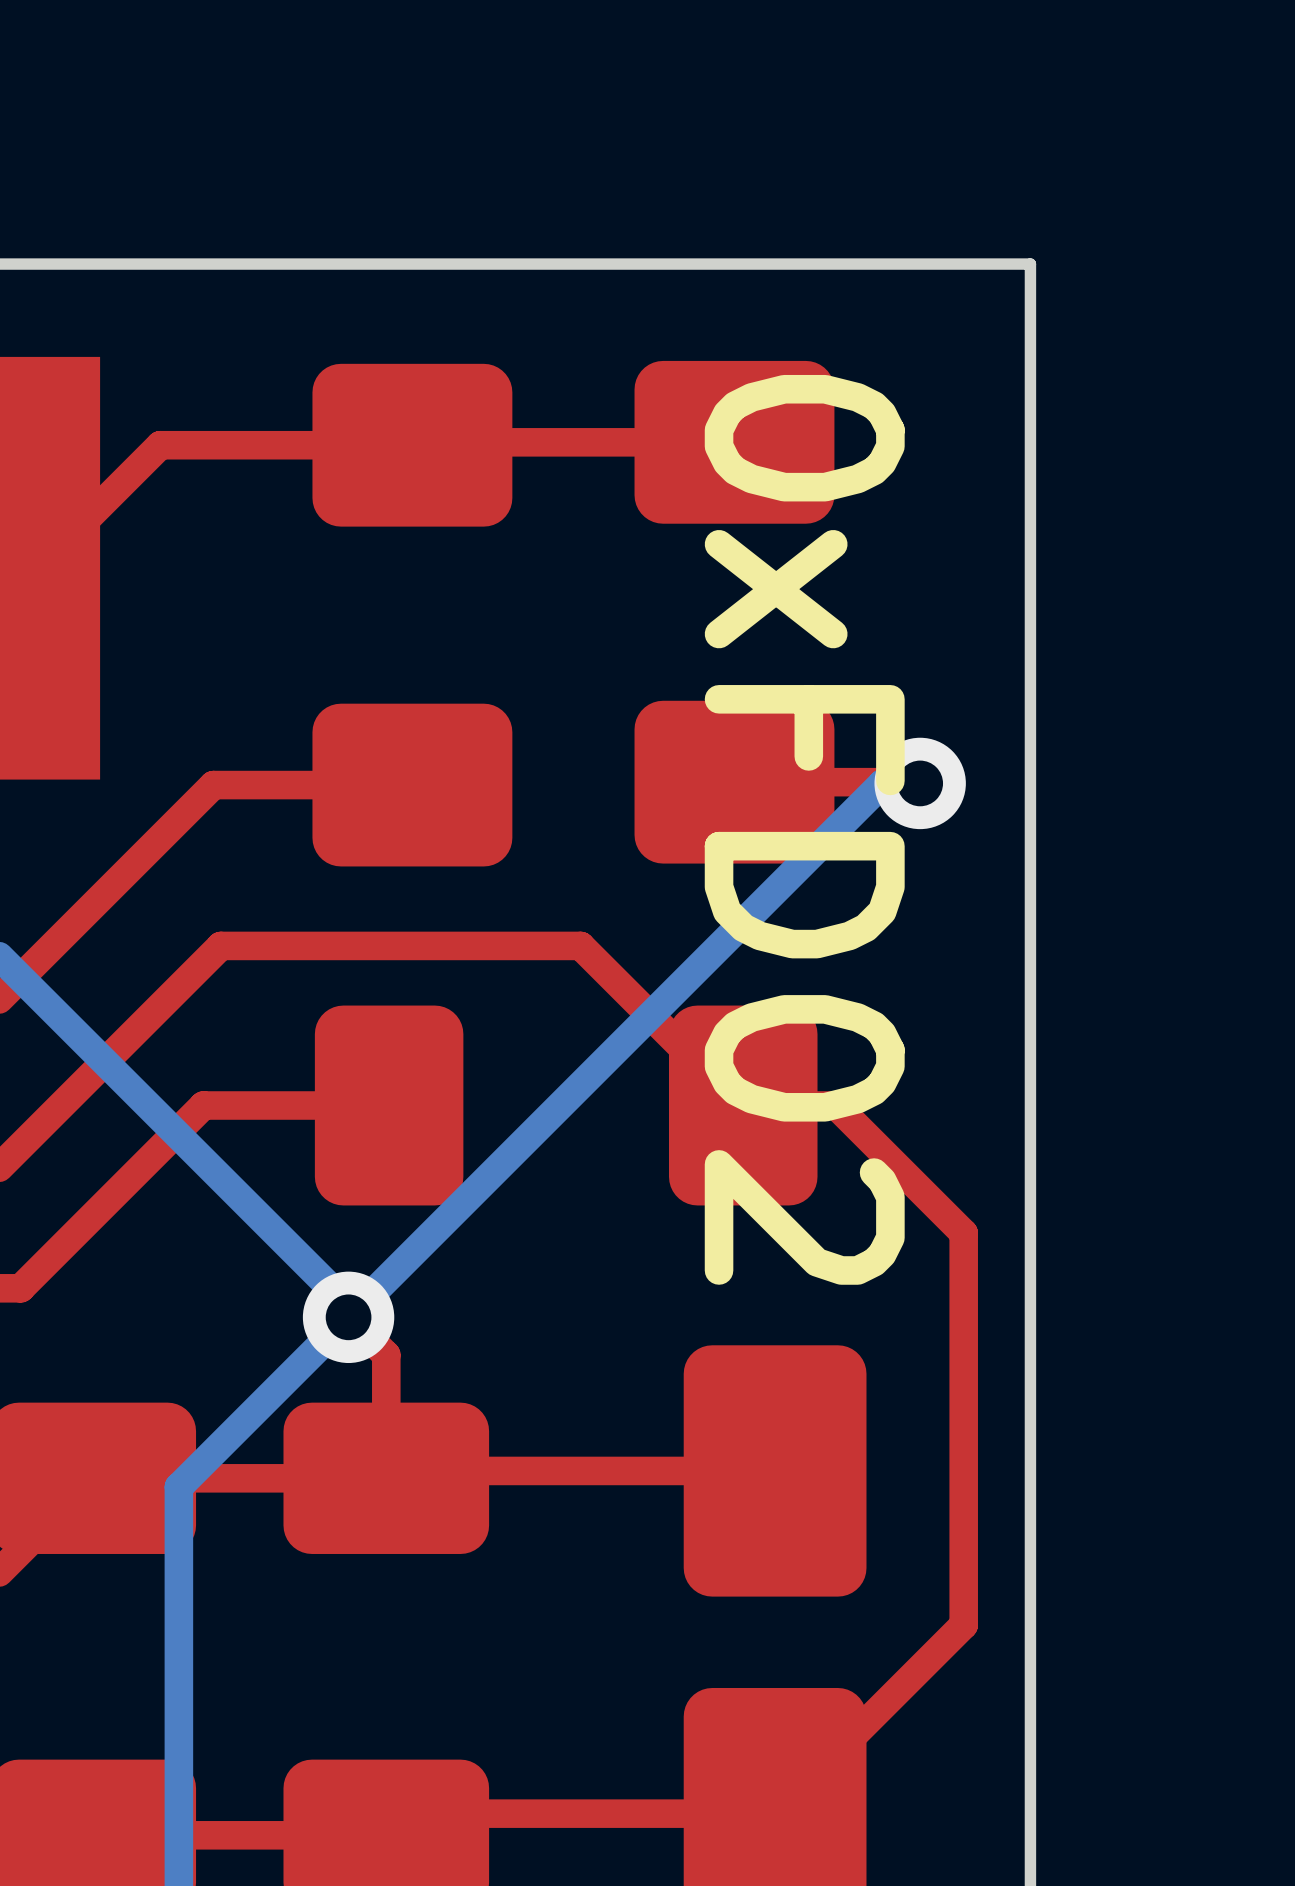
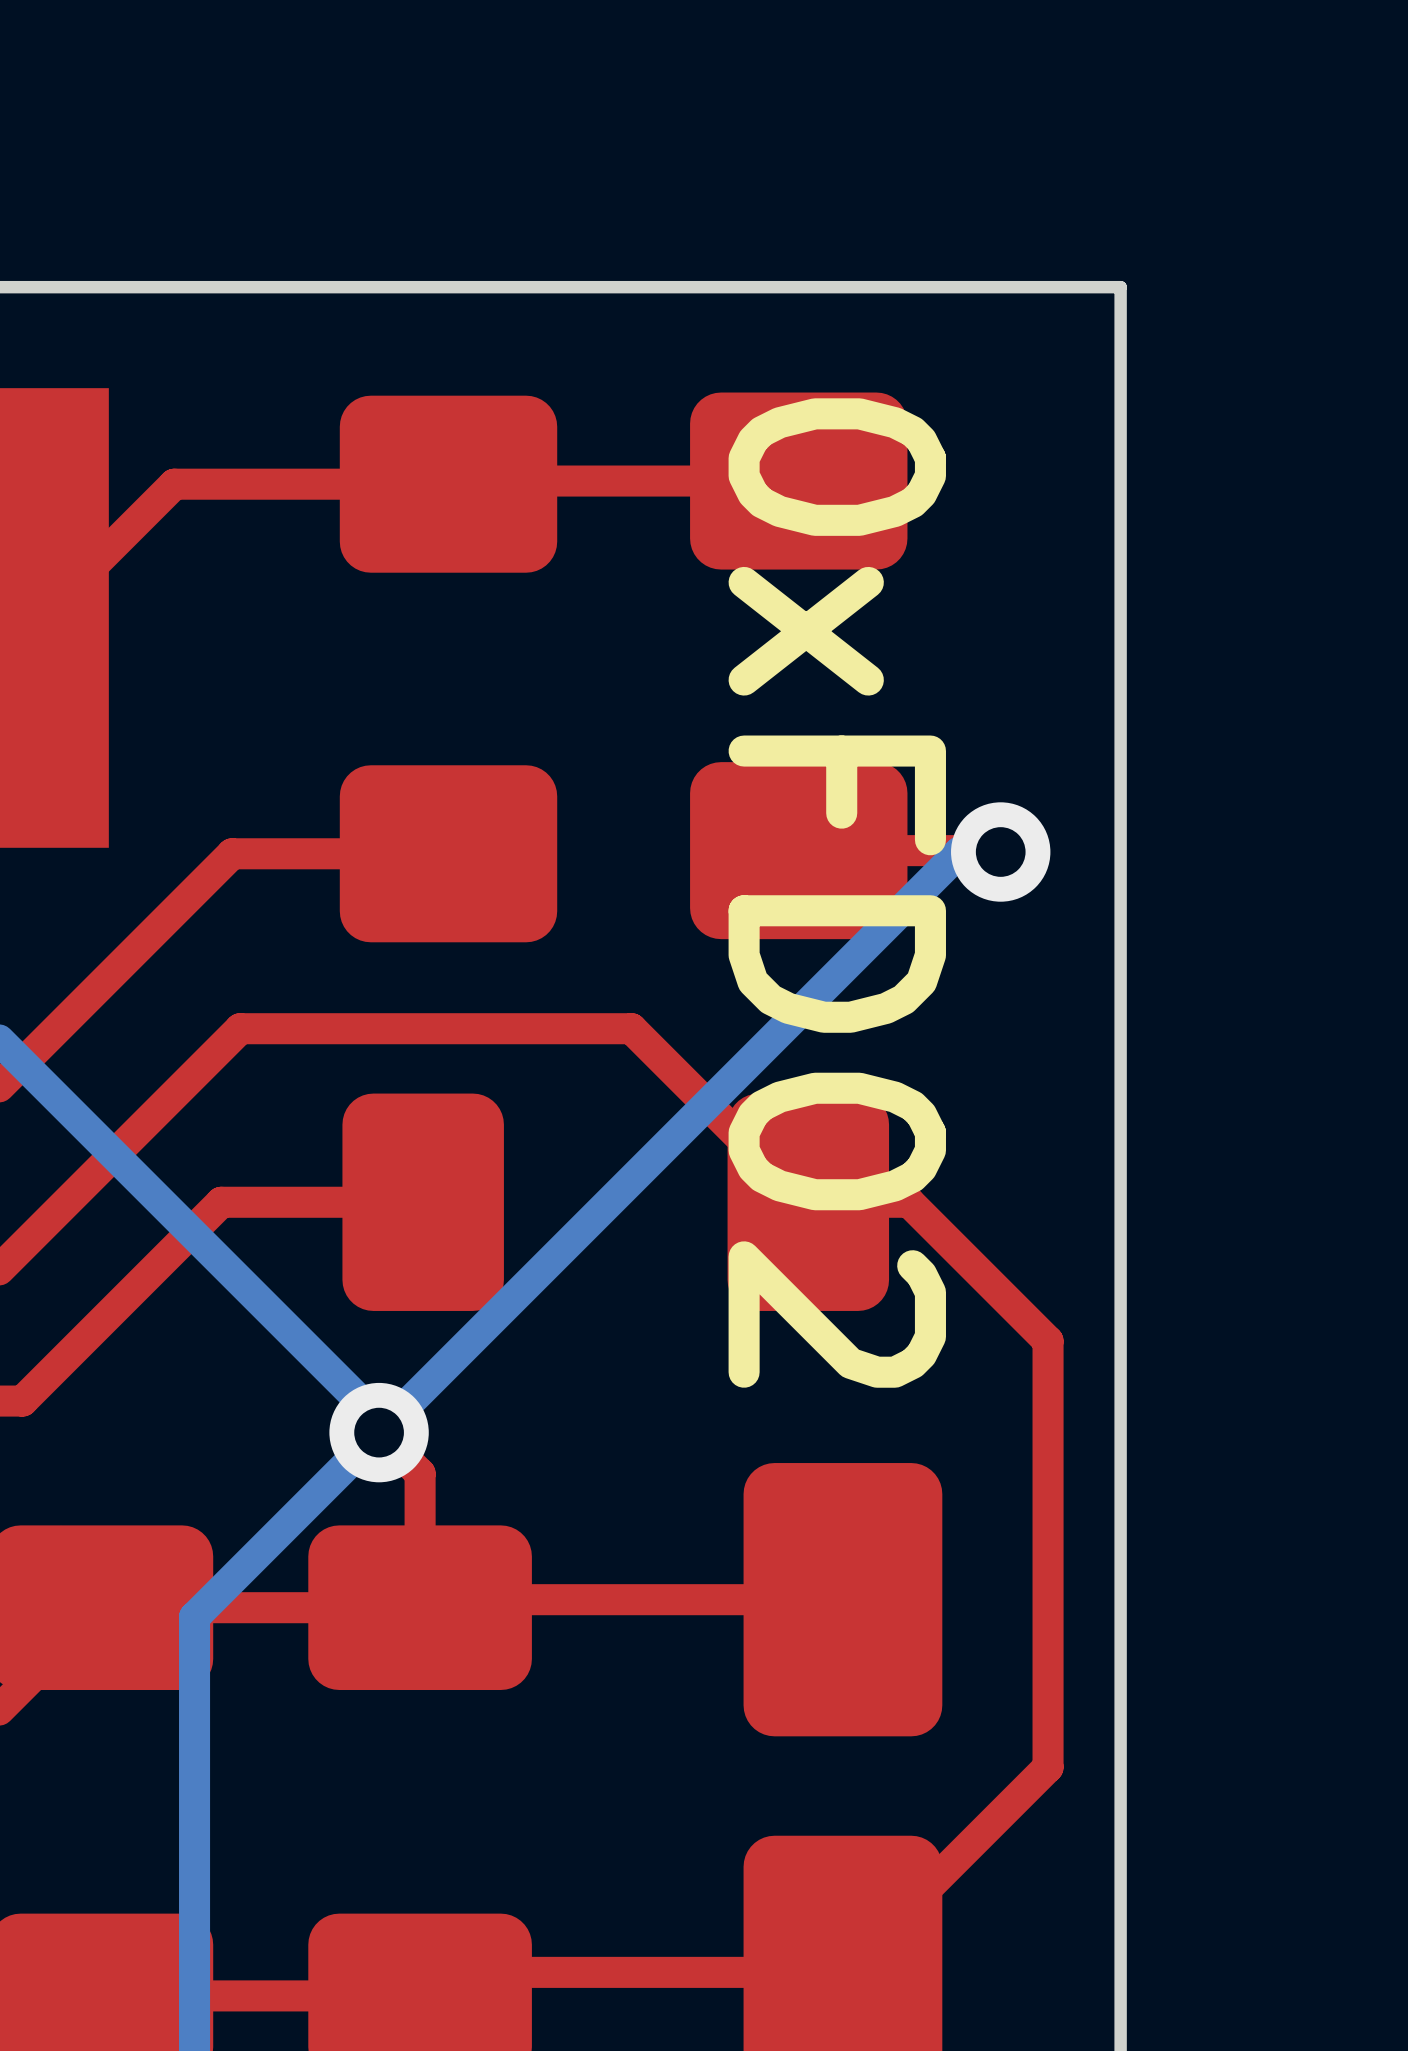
text position: 0xFD02 (804, 829) -> 0xFD02 (837, 893)

